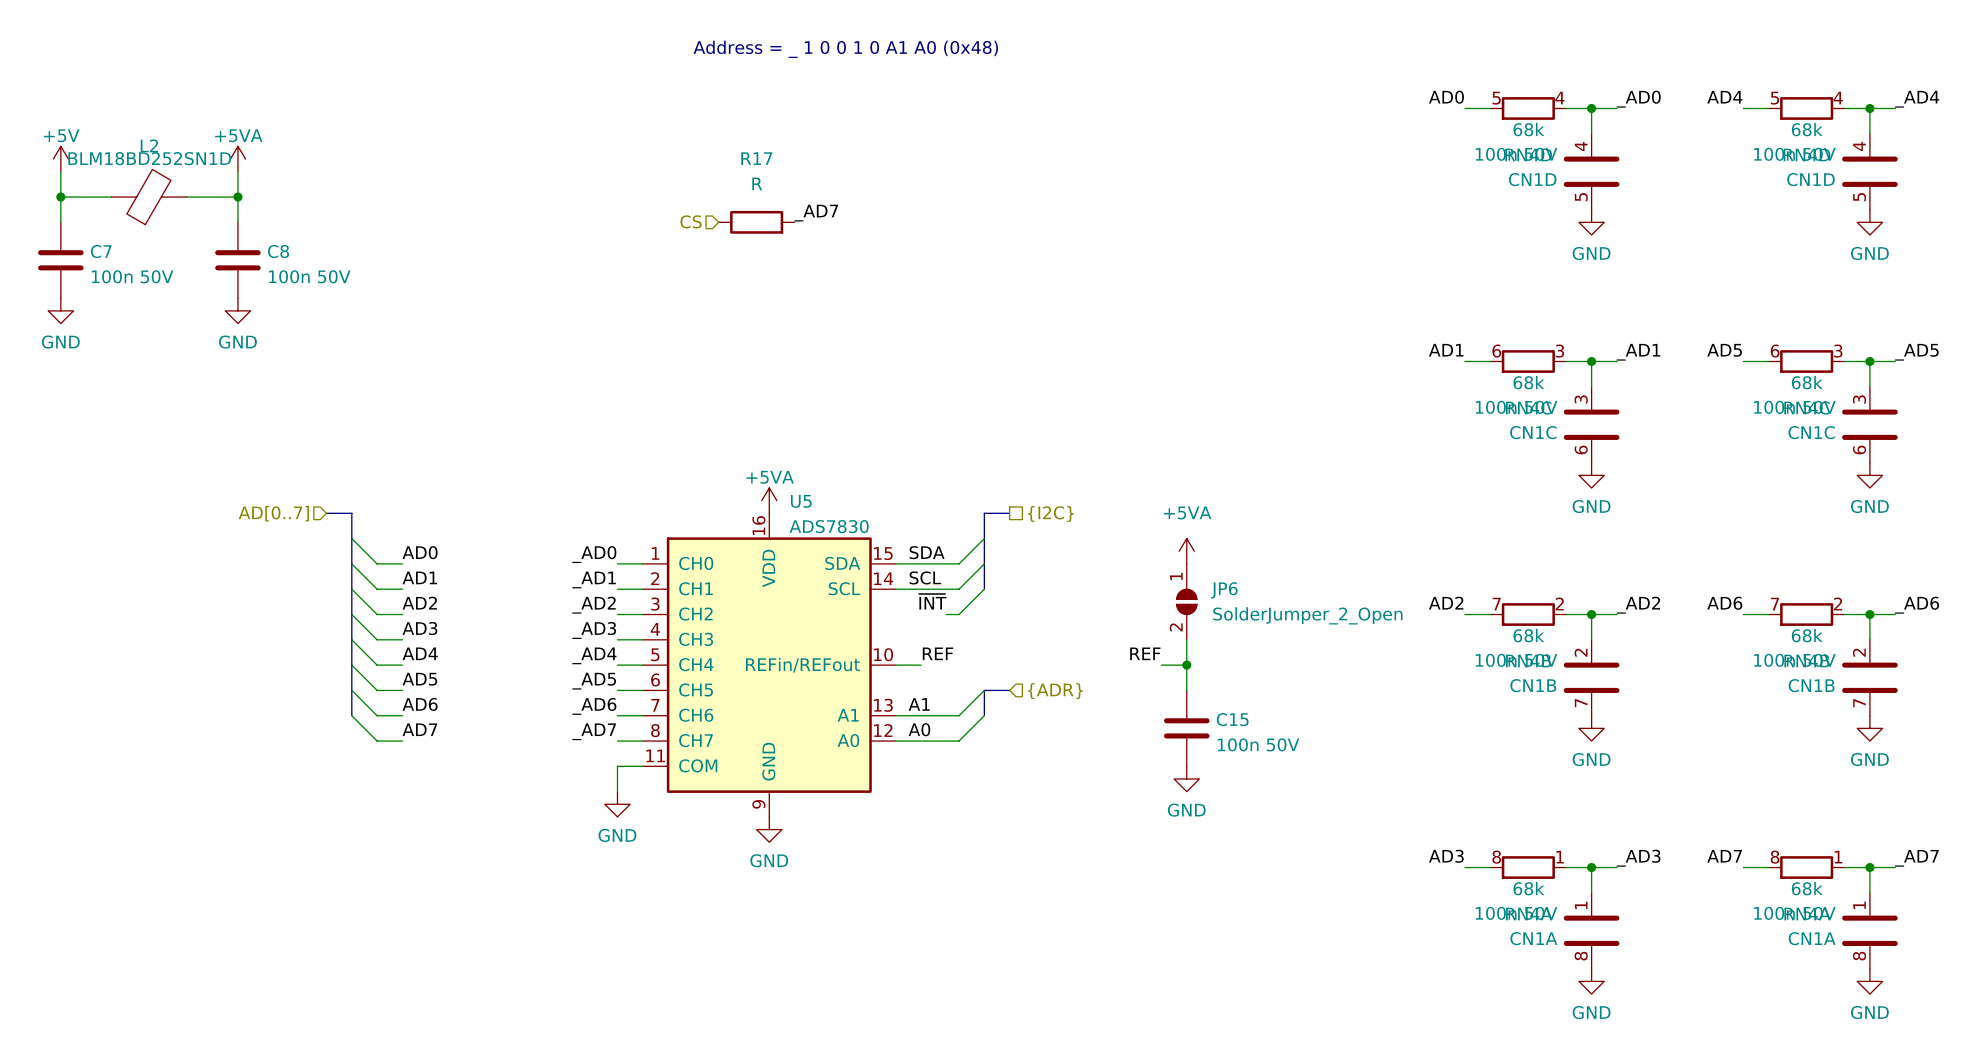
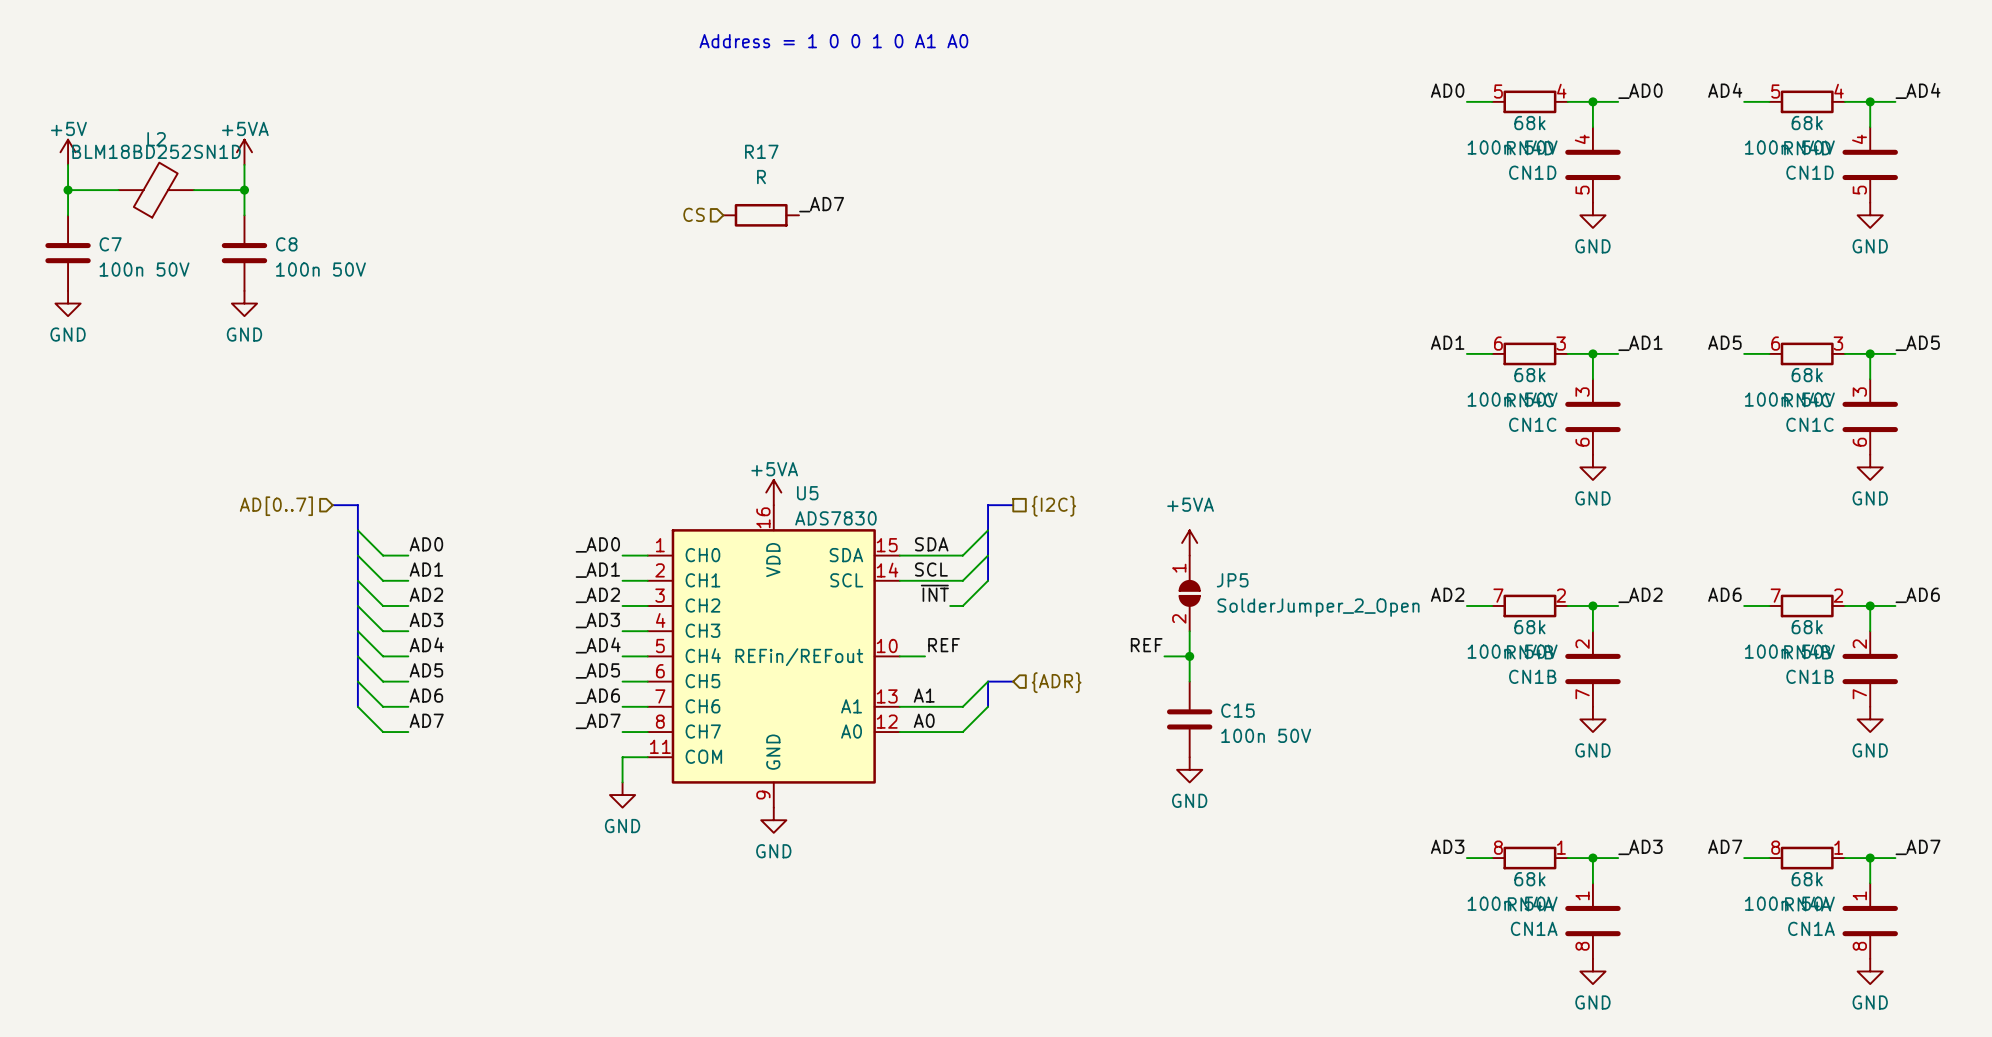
text: Address = _ 1 0 0 1 0 A1 A0 (0x48) (845, 49) -> Address = 1 0 0 1 0 A1 A0 (833, 41)
JP6 name: JP6 (1224, 590) -> JP5 (1232, 580)

